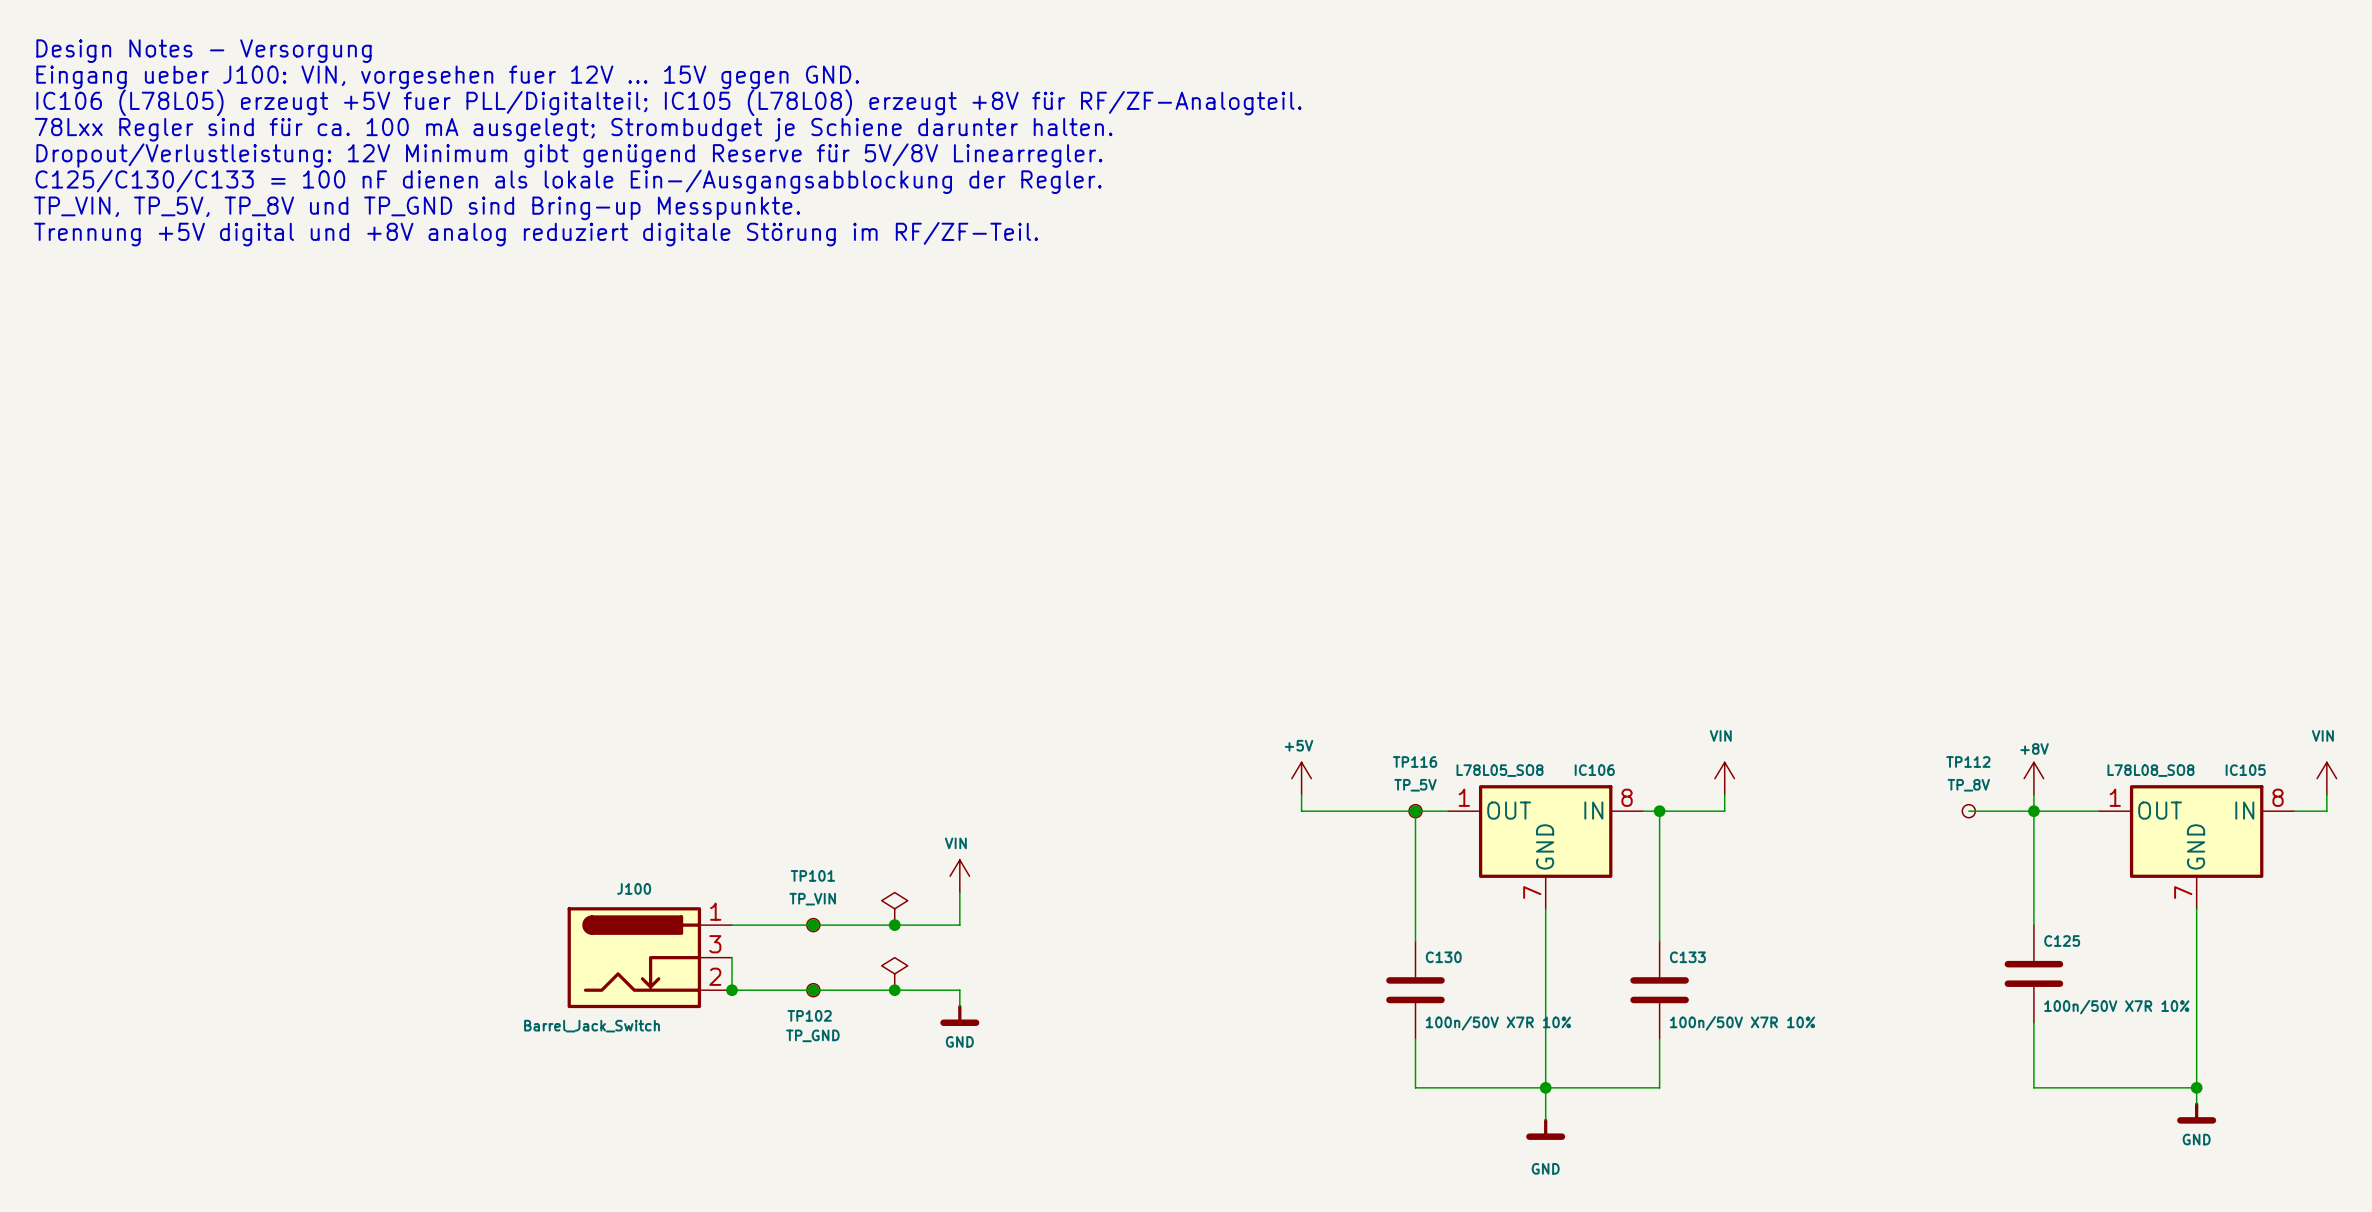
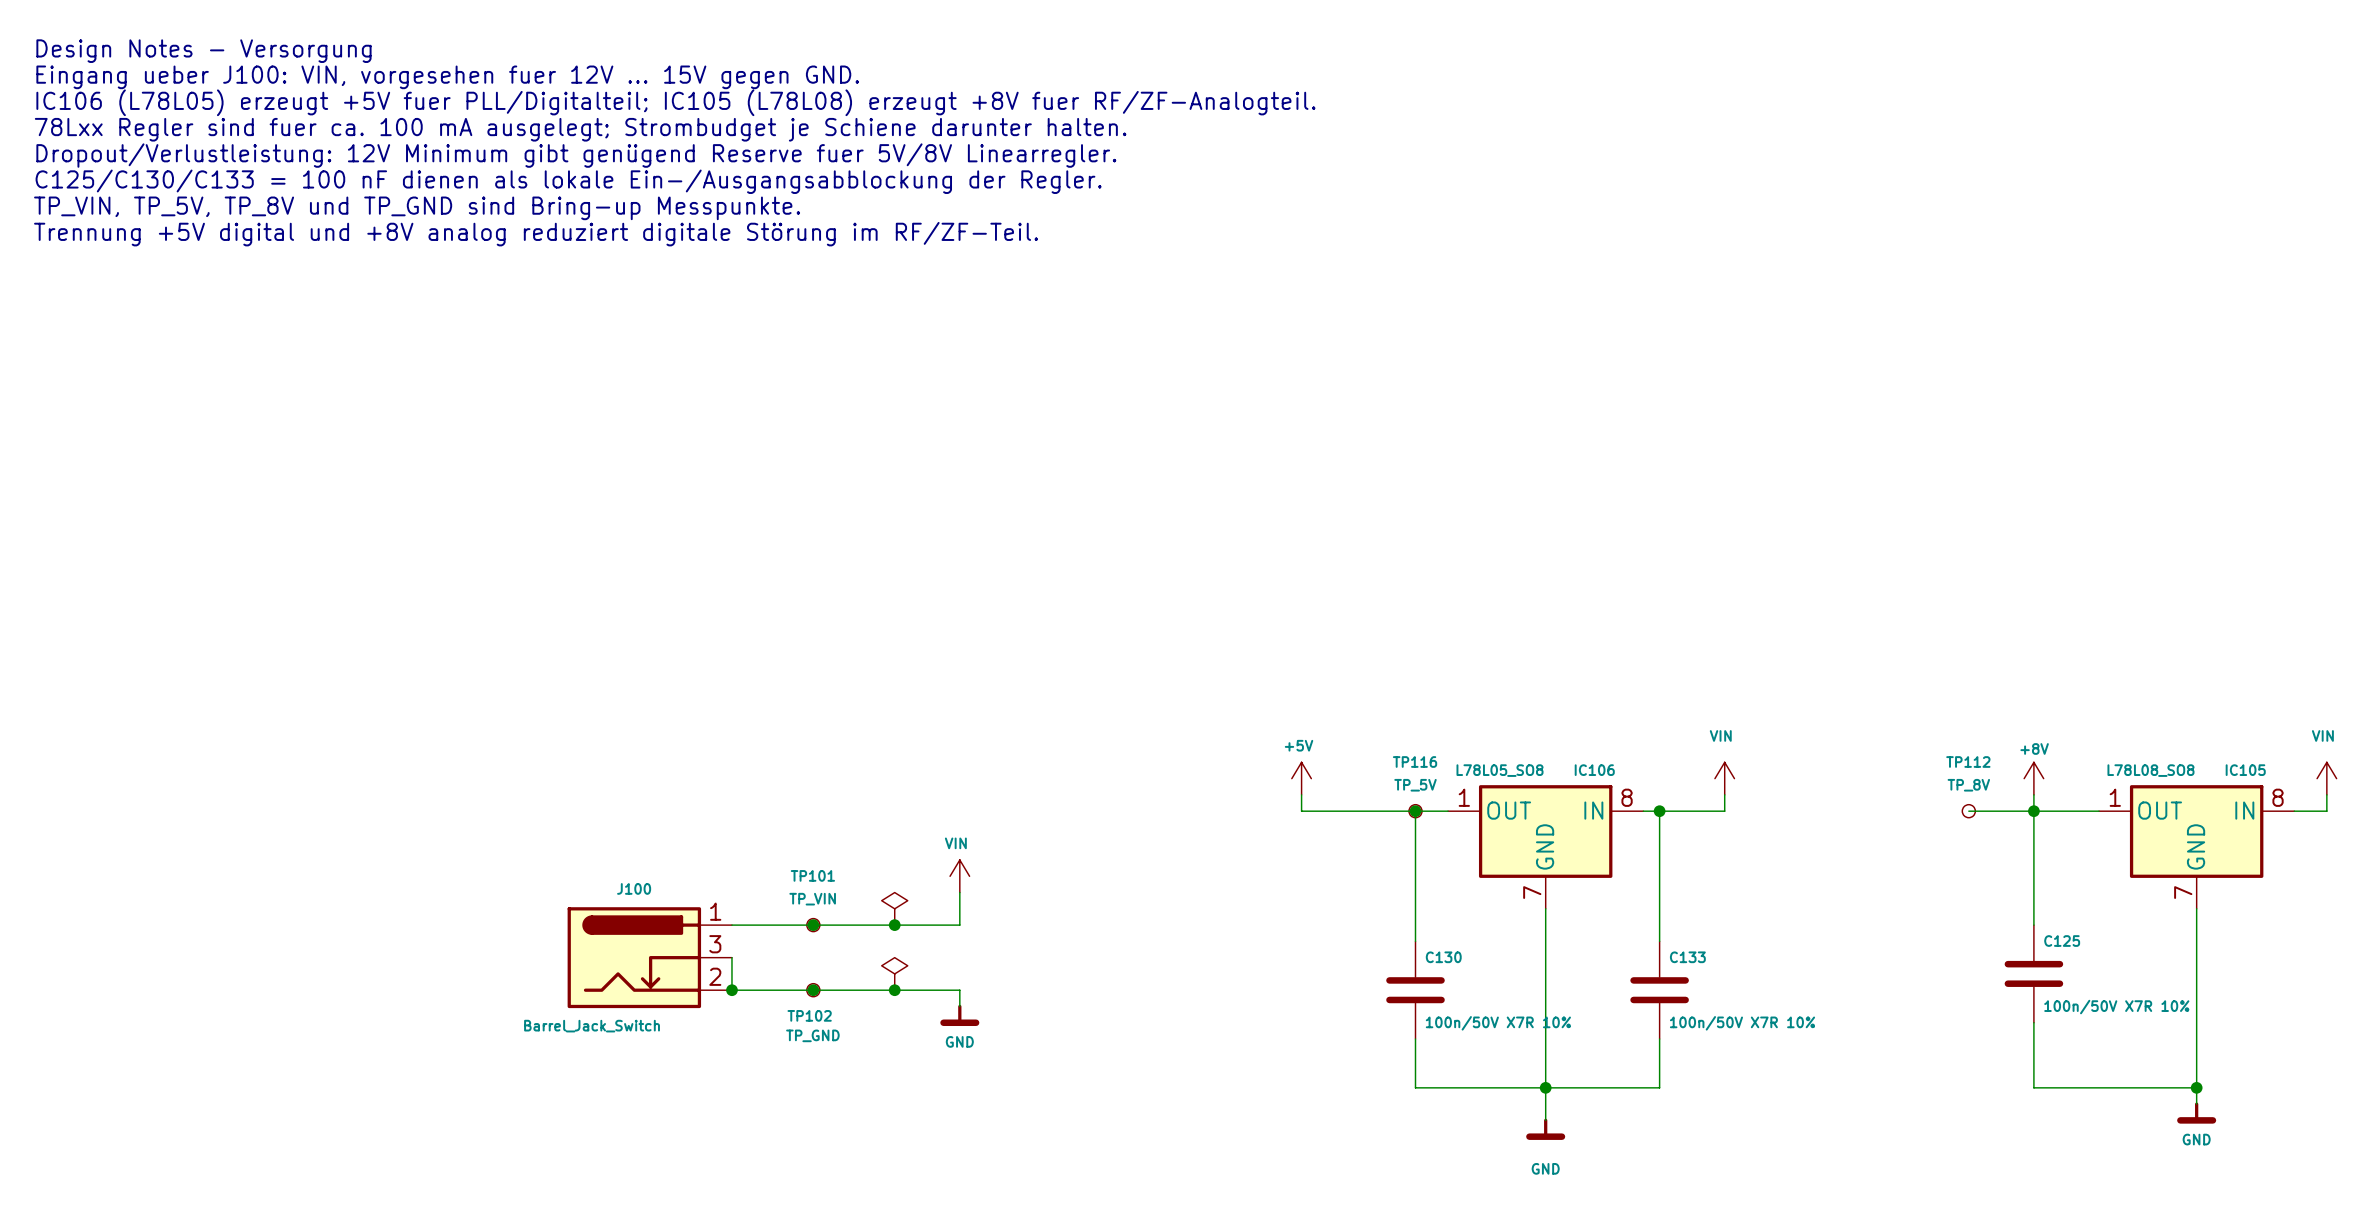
text: IC106 (L78L05) erzeugt +5V fuer PLL/Digitalteil; IC105 (L78L08) erzeugt +8V für RF/ZF-Analogteil. (668, 102) -> IC106 (L78L05) erzeugt +5V fuer PLL/Digitalteil; IC105 (L78L08) erzeugt +8V fuer RF/ZF-Analogteil. (675, 102)
text: 78Lxx Regler sind für ca. 100 mA ausgelegt; Strombudget je Schiene darunter halten. (573, 129) -> 78Lxx Regler sind fuer ca. 100 mA ausgelegt; Strombudget je Schiene darunter halten. (580, 129)
text: Dropout/Verlustleistung: 12V Minimum gibt genügend Reserve für 5V/8V Linearregler. (569, 155) -> Dropout/Verlustleistung: 12V Minimum gibt genügend Reserve fuer 5V/8V Linearregler. (576, 155)

